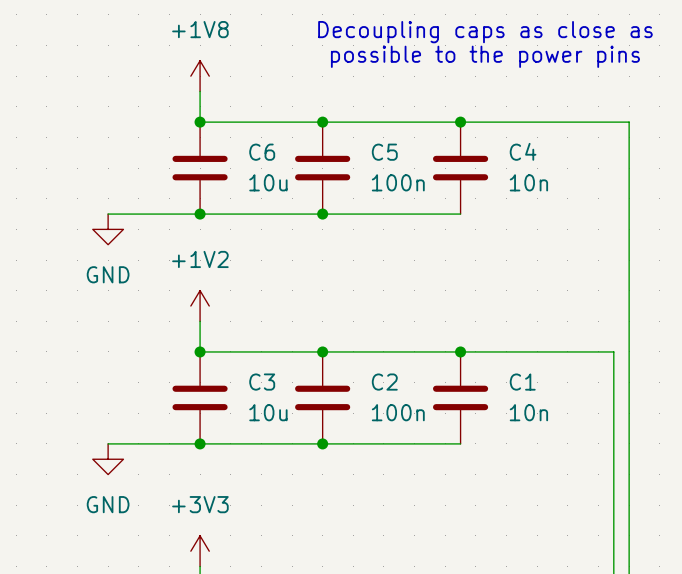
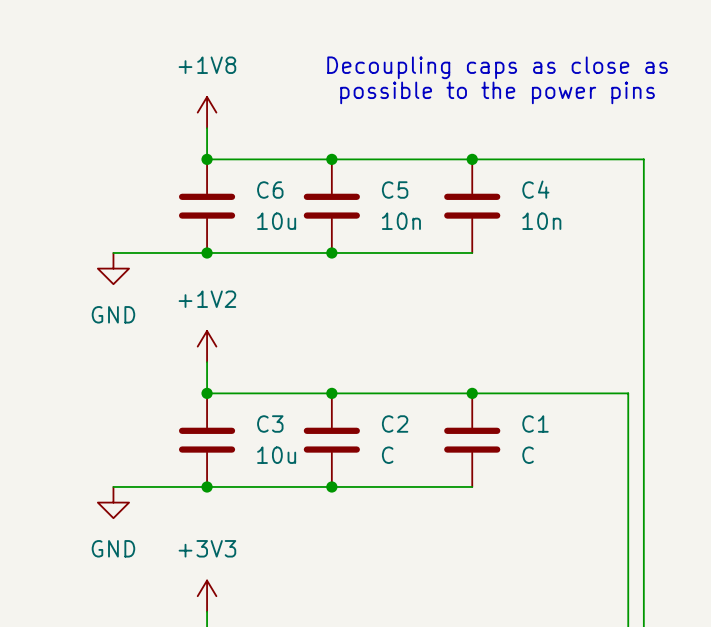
C5 value: 100n (398, 182) -> 10n (401, 221)
C2 value: 100n (398, 412) -> C (387, 455)
C1 value: 10n (528, 412) -> C (528, 455)

